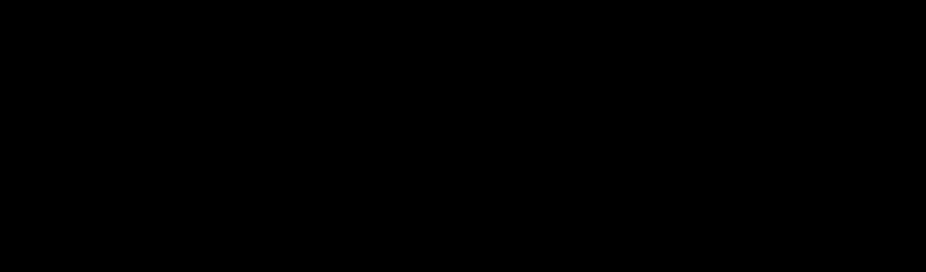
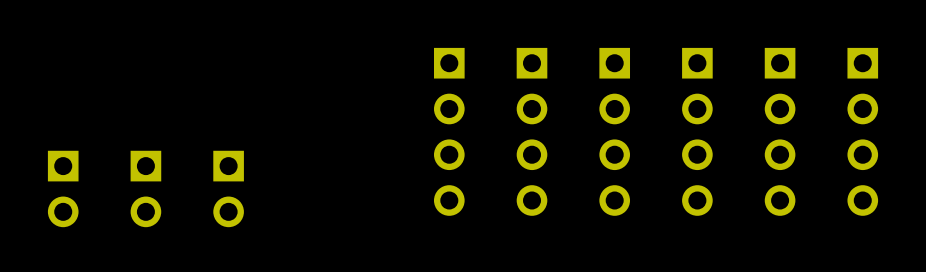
part: none -> (449, 131)
part: none -> (532, 131)
part: none -> (614, 131)
part: none -> (697, 131)
part: none -> (780, 131)
part: none -> (862, 131)
part: none -> (63, 188)
part: none -> (145, 188)
part: none -> (228, 188)

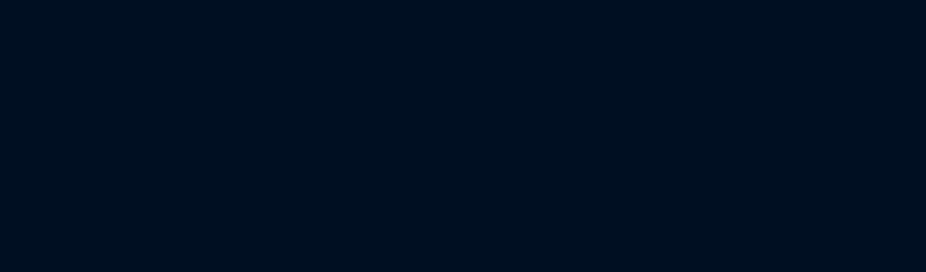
part: (449, 131) -> none
part: (532, 131) -> none
part: (614, 131) -> none
part: (697, 131) -> none
part: (780, 131) -> none
part: (862, 131) -> none
part: (63, 188) -> none
part: (145, 188) -> none
part: (228, 188) -> none

